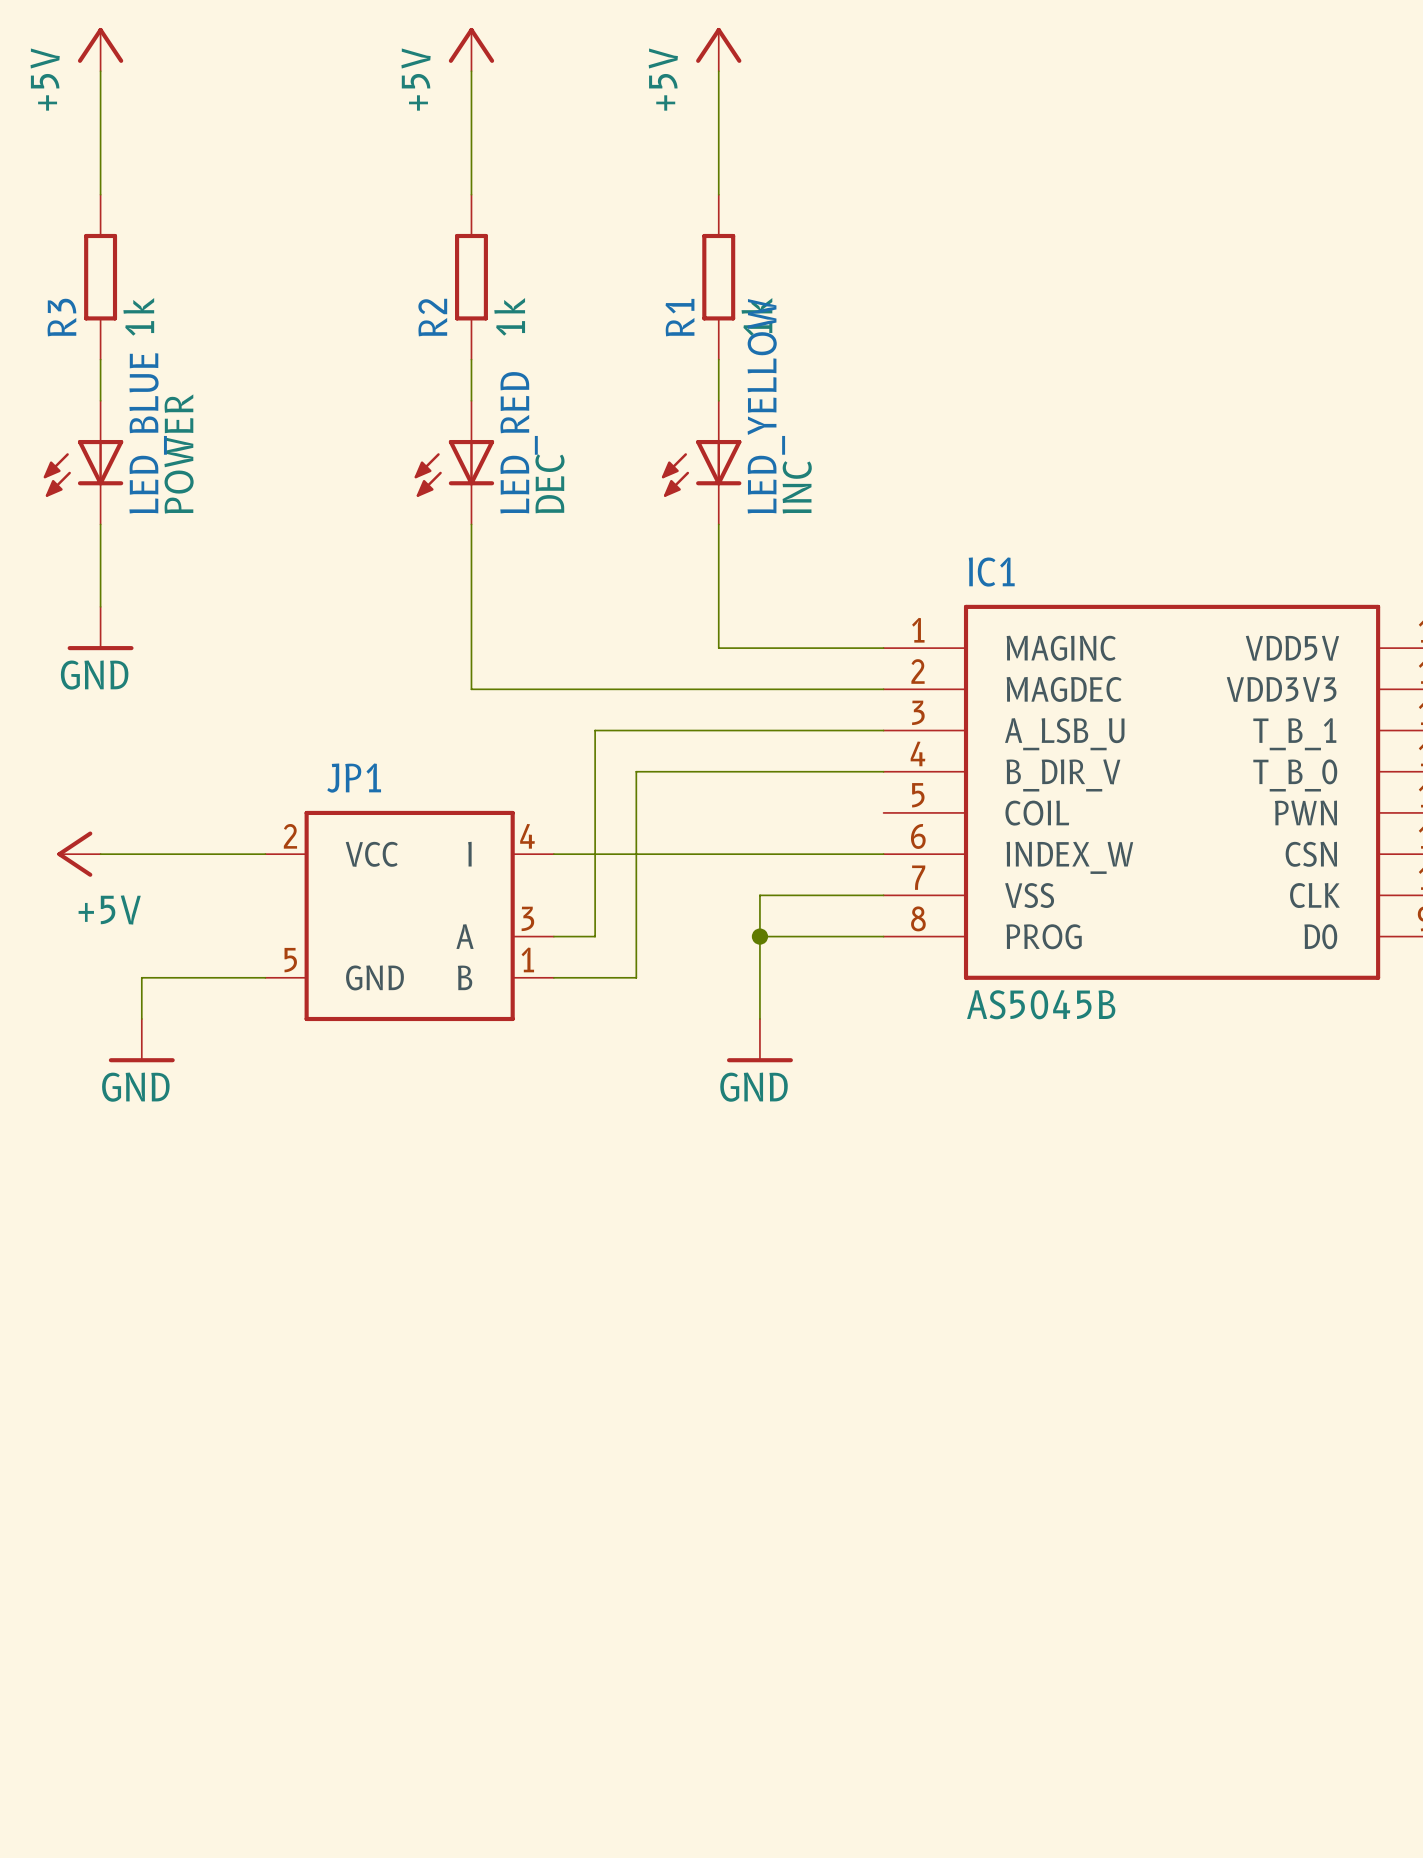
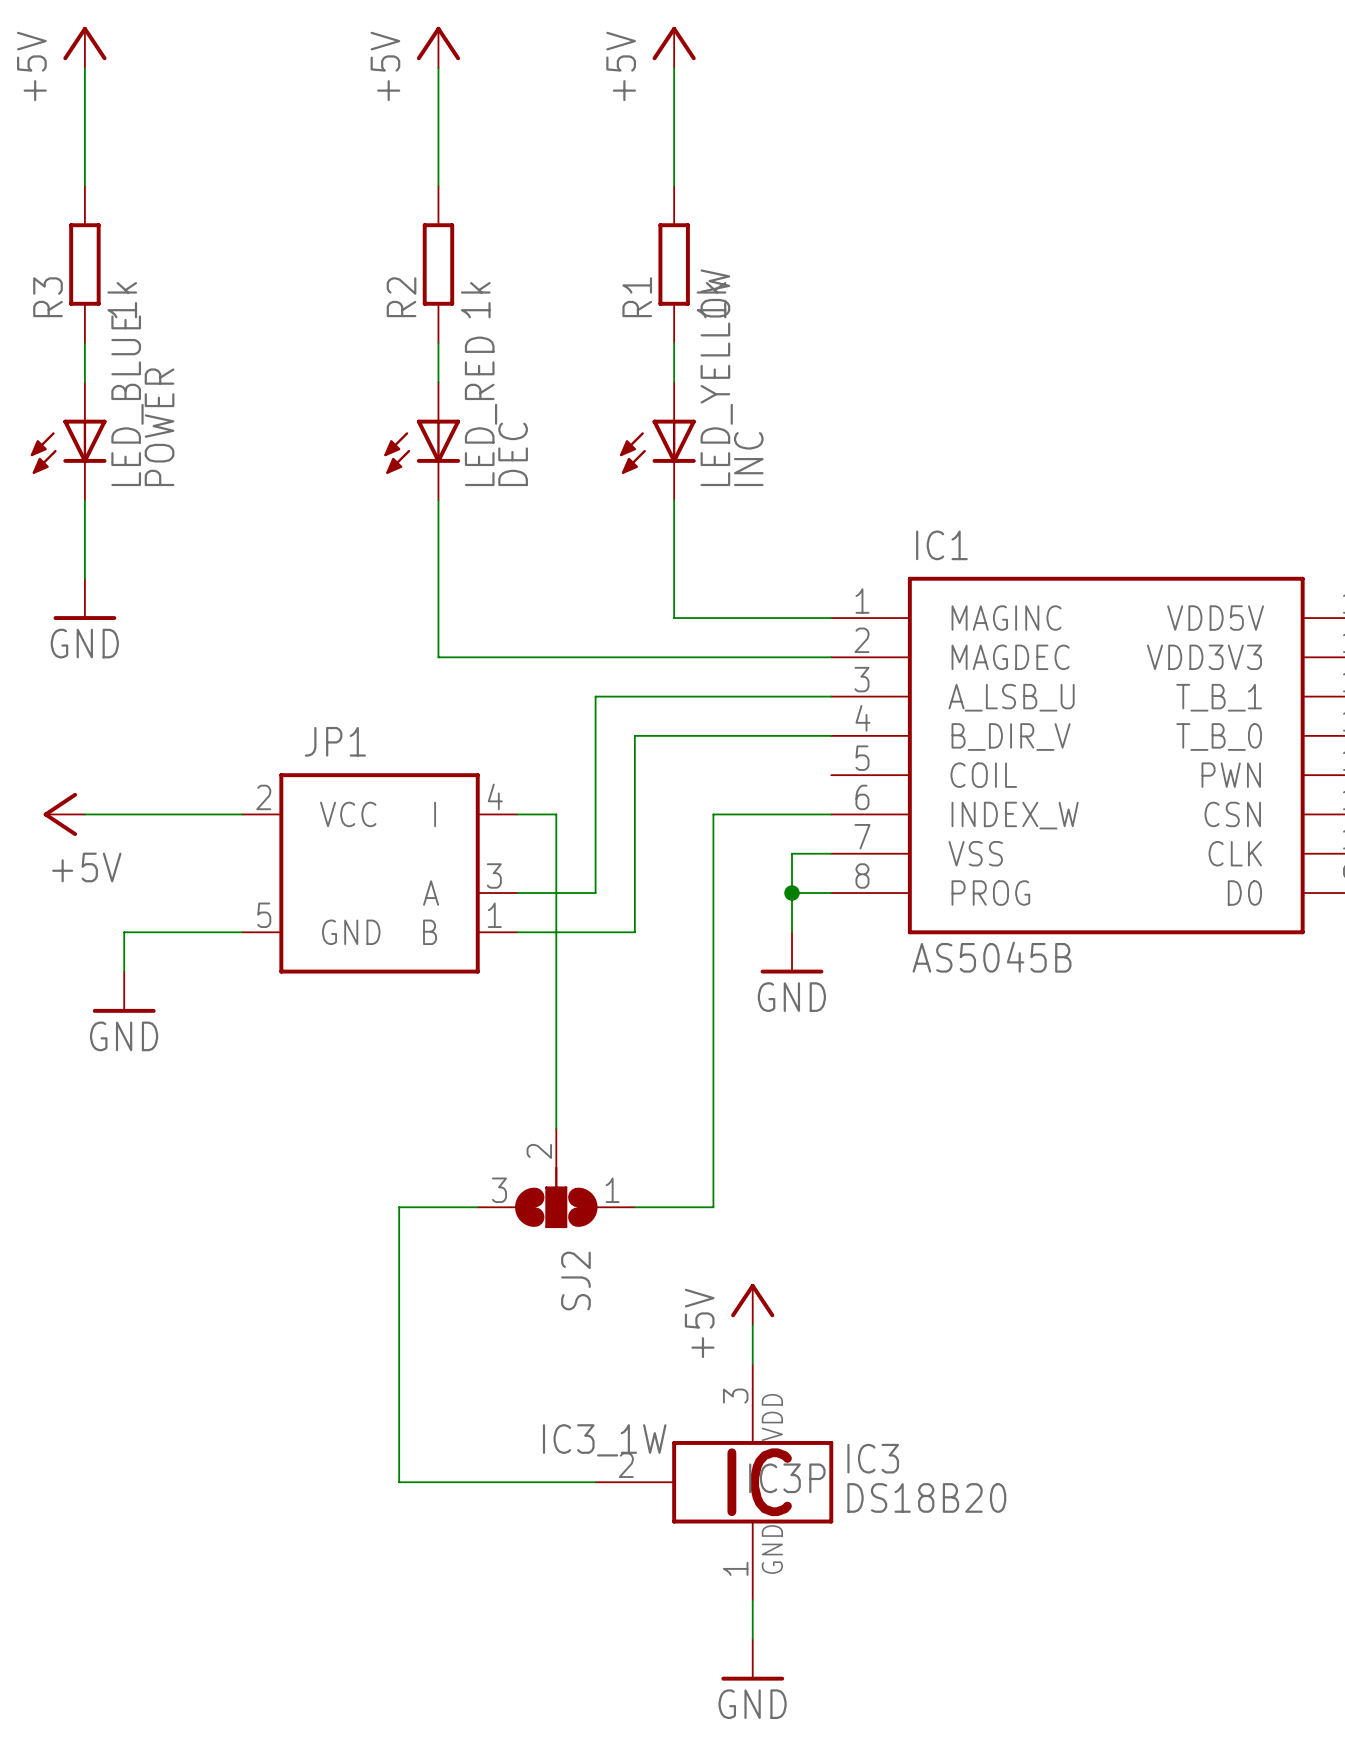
wire: (636, 730) (595, 730) (595, 854) (759, 854) -> none
wire: (636, 771) (677, 771) -> (595, 735) (595, 696)
wire: (759, 895) (842, 895) -> (713, 853) (713, 814)
wire: none -> (792, 853) (792, 932)
wire: (636, 936) (636, 977) -> (634, 735) (634, 932) (595, 932)
wire: none -> (595, 893) (556, 893) (556, 1128)
wire: (759, 936) (842, 936) -> none
junction position: (759, 936) -> (792, 893)
wire: none -> (713, 971) (713, 1207) (634, 1207)
power symbol position: GND (759, 1040) -> GND (792, 952)
SJ2: none -> (556, 1178)
wire: none -> (477, 1207) (399, 1207) (399, 1482) (595, 1482)
power symbol: none -> +5V (752, 1304)
wire: none -> (752, 1325) (752, 1364)
IC3_1W: none -> (634, 1482)
IC3: none -> DS18B20 (752, 1482)
IC3P: none -> (752, 1482)
wire: none -> (752, 1600) (752, 1639)
power symbol: none -> GND (752, 1660)

